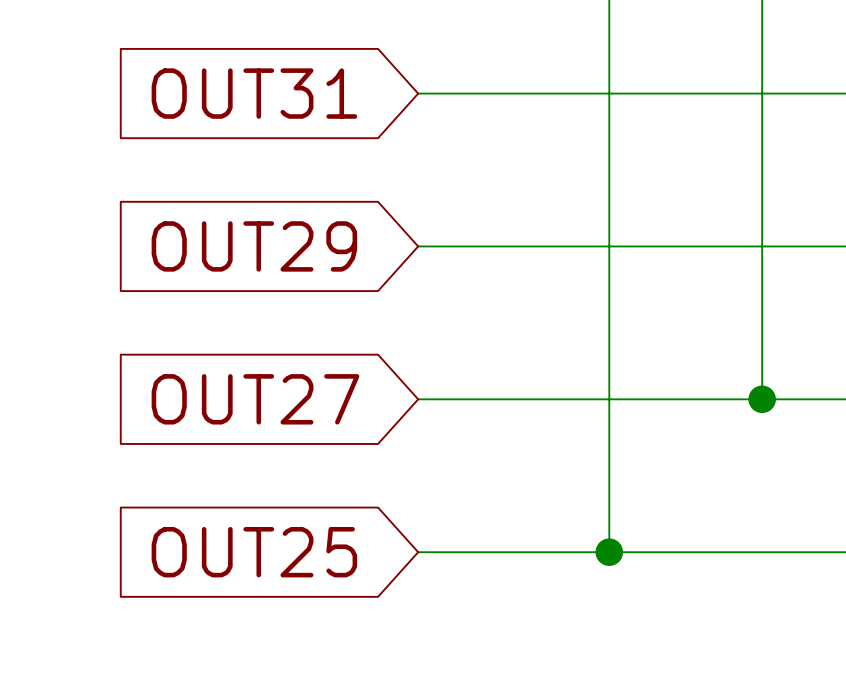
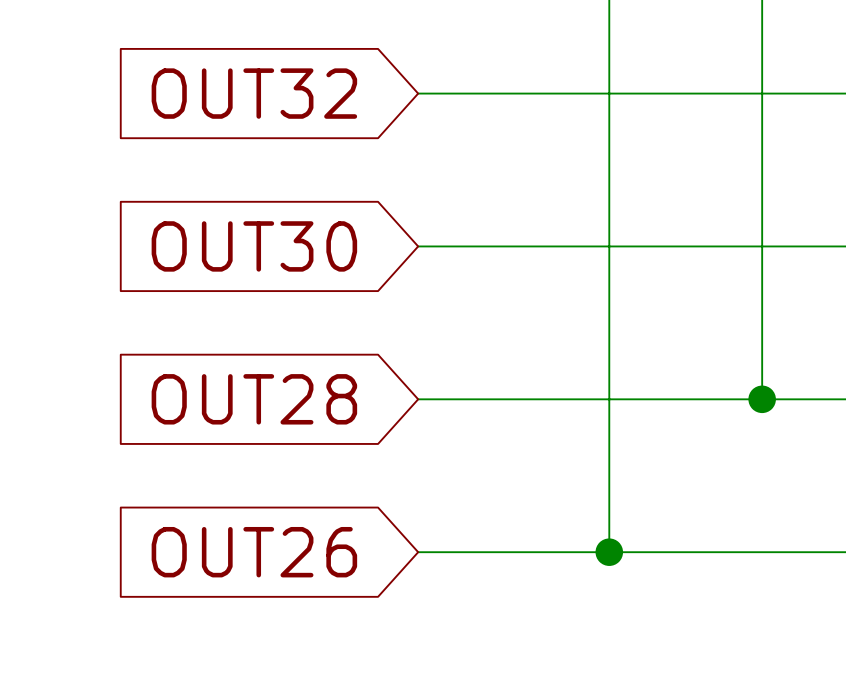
global label: OUT31 (254, 93) -> OUT32 (254, 93)
global label: OUT29 (254, 246) -> OUT30 (254, 246)
global label: OUT27 (255, 399) -> OUT28 (254, 399)
global label: OUT25 (254, 552) -> OUT26 (254, 552)

